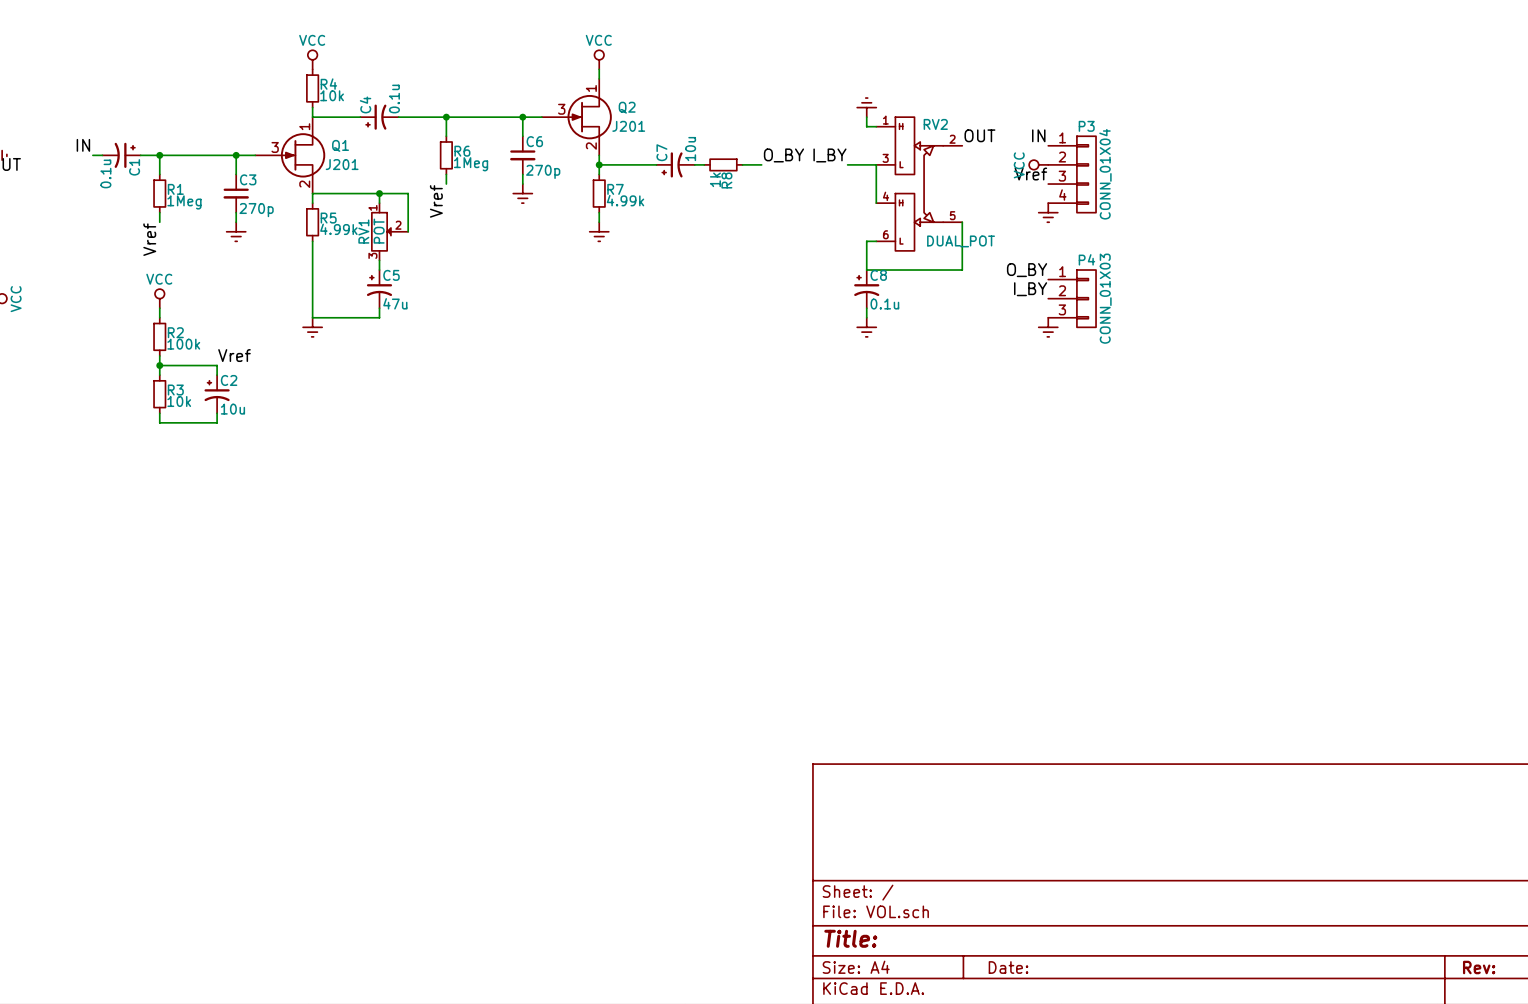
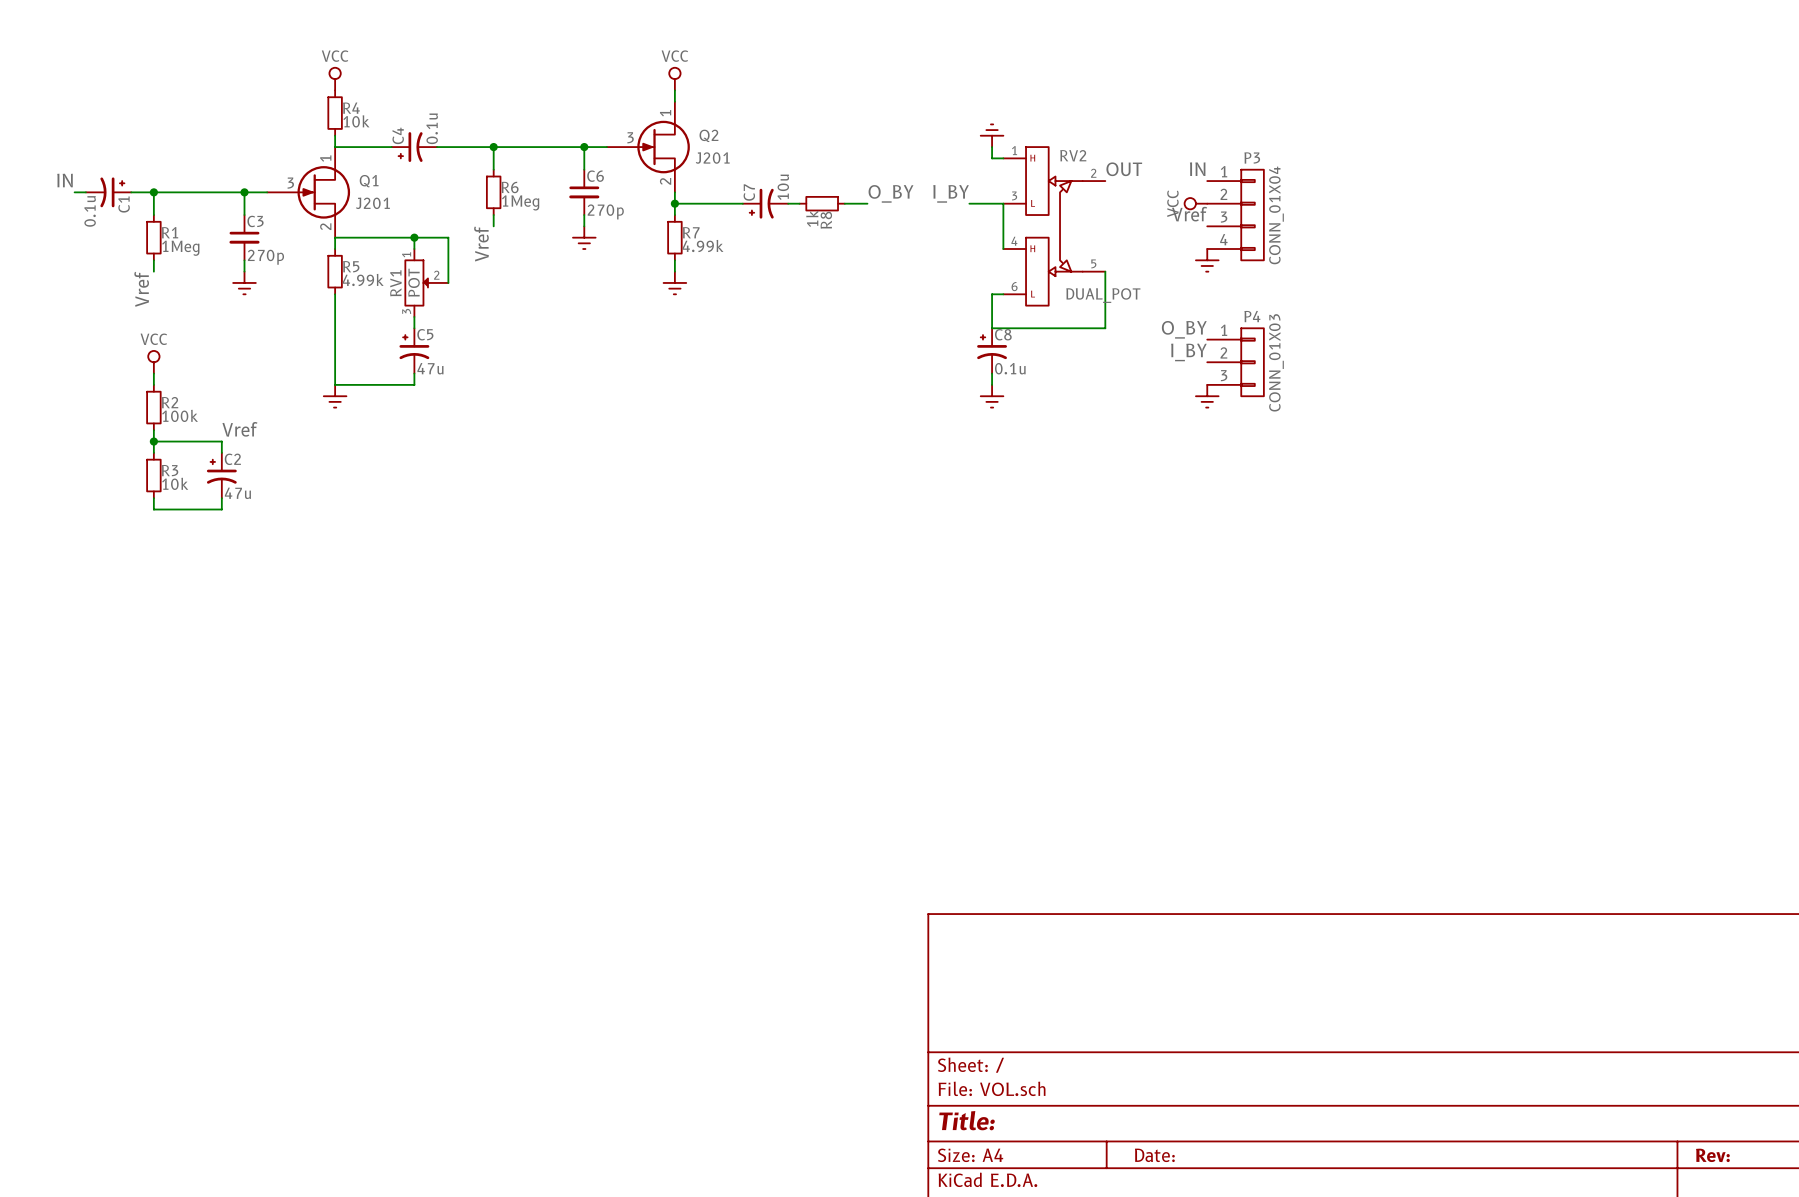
C2 value: 10u (232, 409) -> 47u (237, 493)

